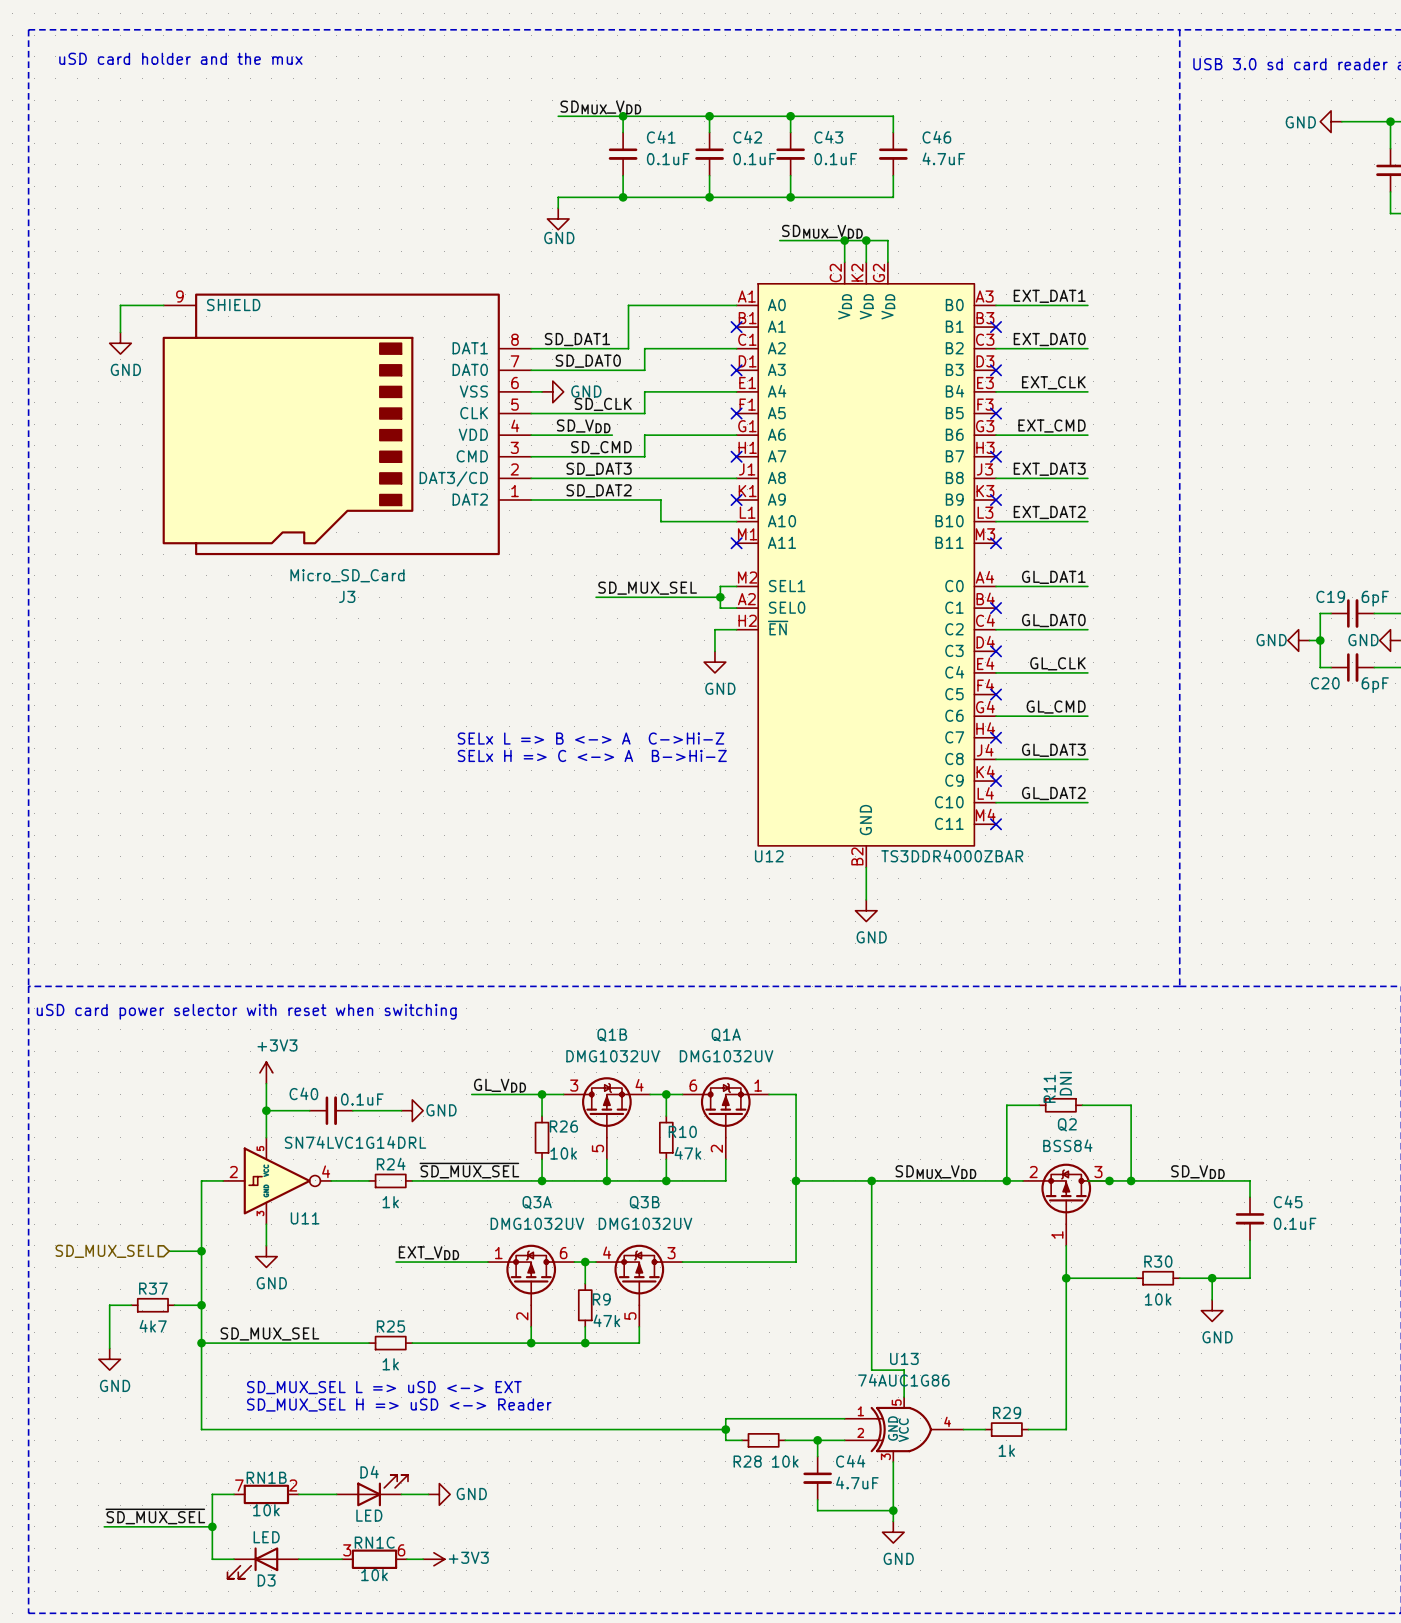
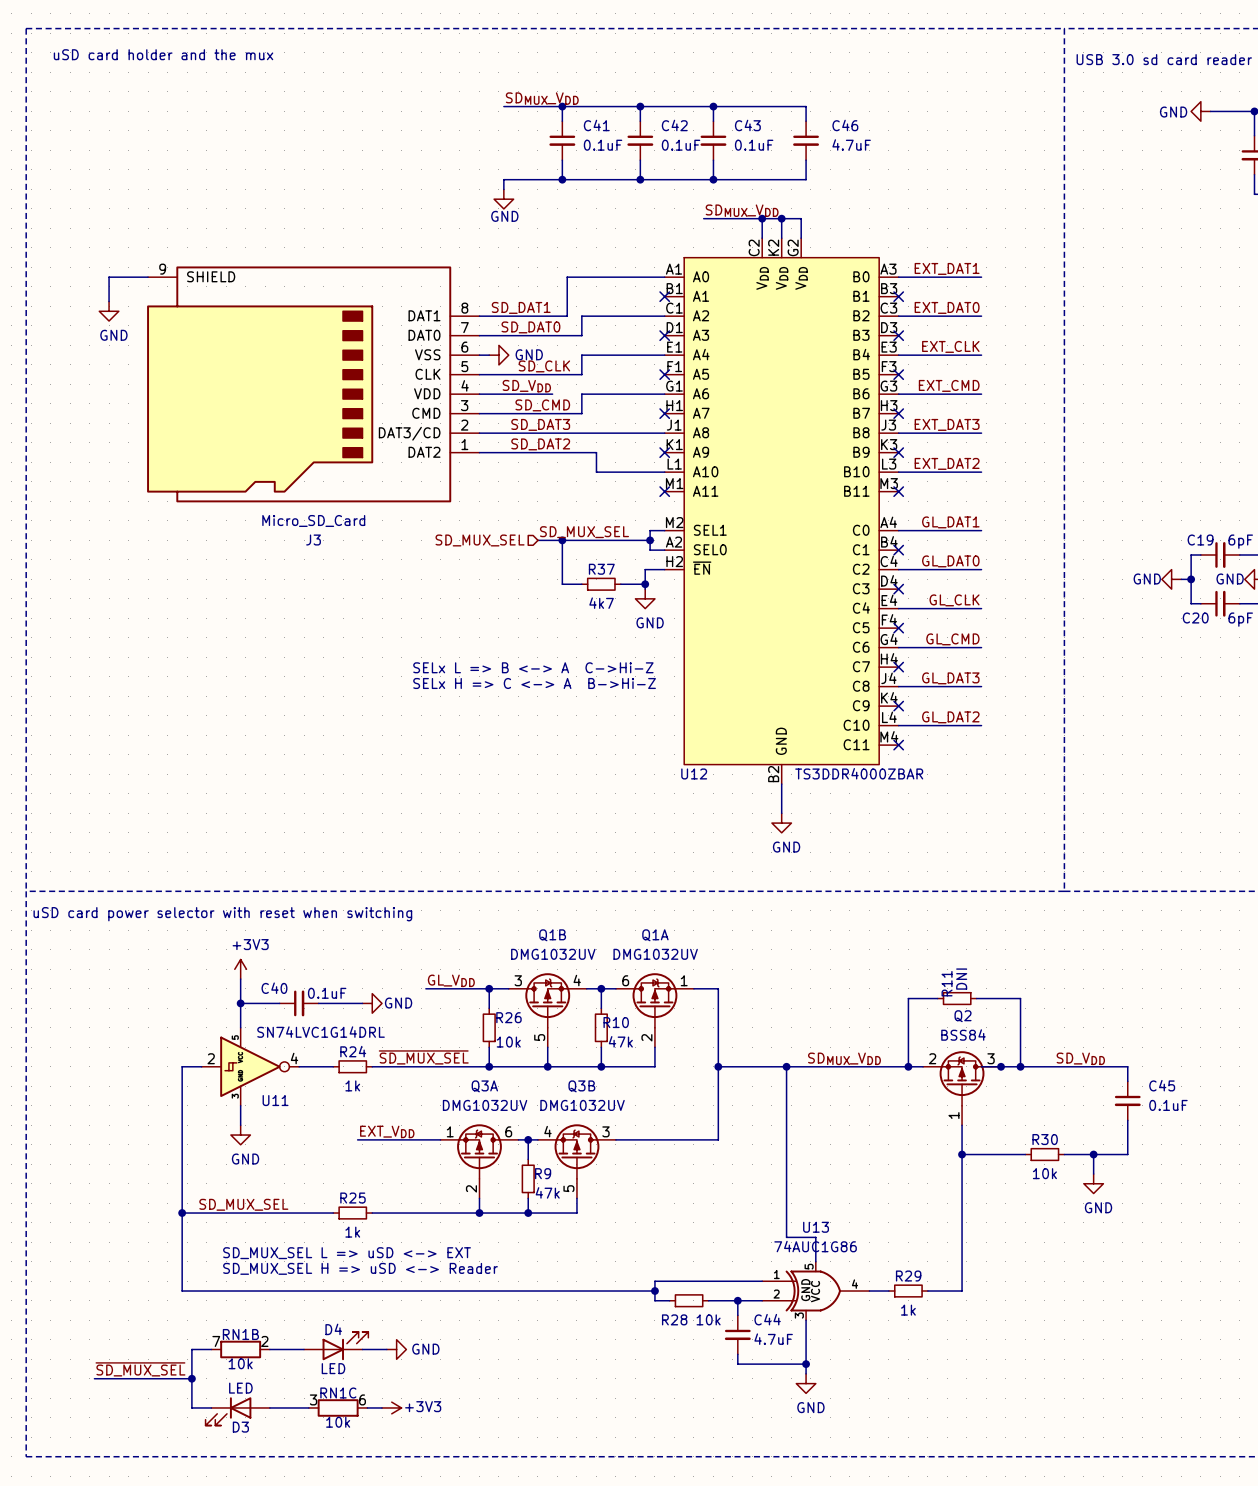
hierarchical label: none -> SD_MUX_SEL (480, 540)
wire: none -> (562, 540) (562, 584) (581, 584)
junction: none -> (562, 540)
wire: none -> (620, 584) (645, 584)
junction: none -> (645, 584)
hierarchical label: SD_MUX_SEL (104, 1251) -> none
wire: (169, 1251) (201, 1251) -> none
junction: (201, 1251) -> none
wire: (131, 1305) (109, 1305) (109, 1348) -> none
R37 position: (152, 1305) -> (601, 584)
wire: (174, 1305) (201, 1305) -> none
junction: (201, 1305) -> none
power symbol: GND (109, 1359) -> none

